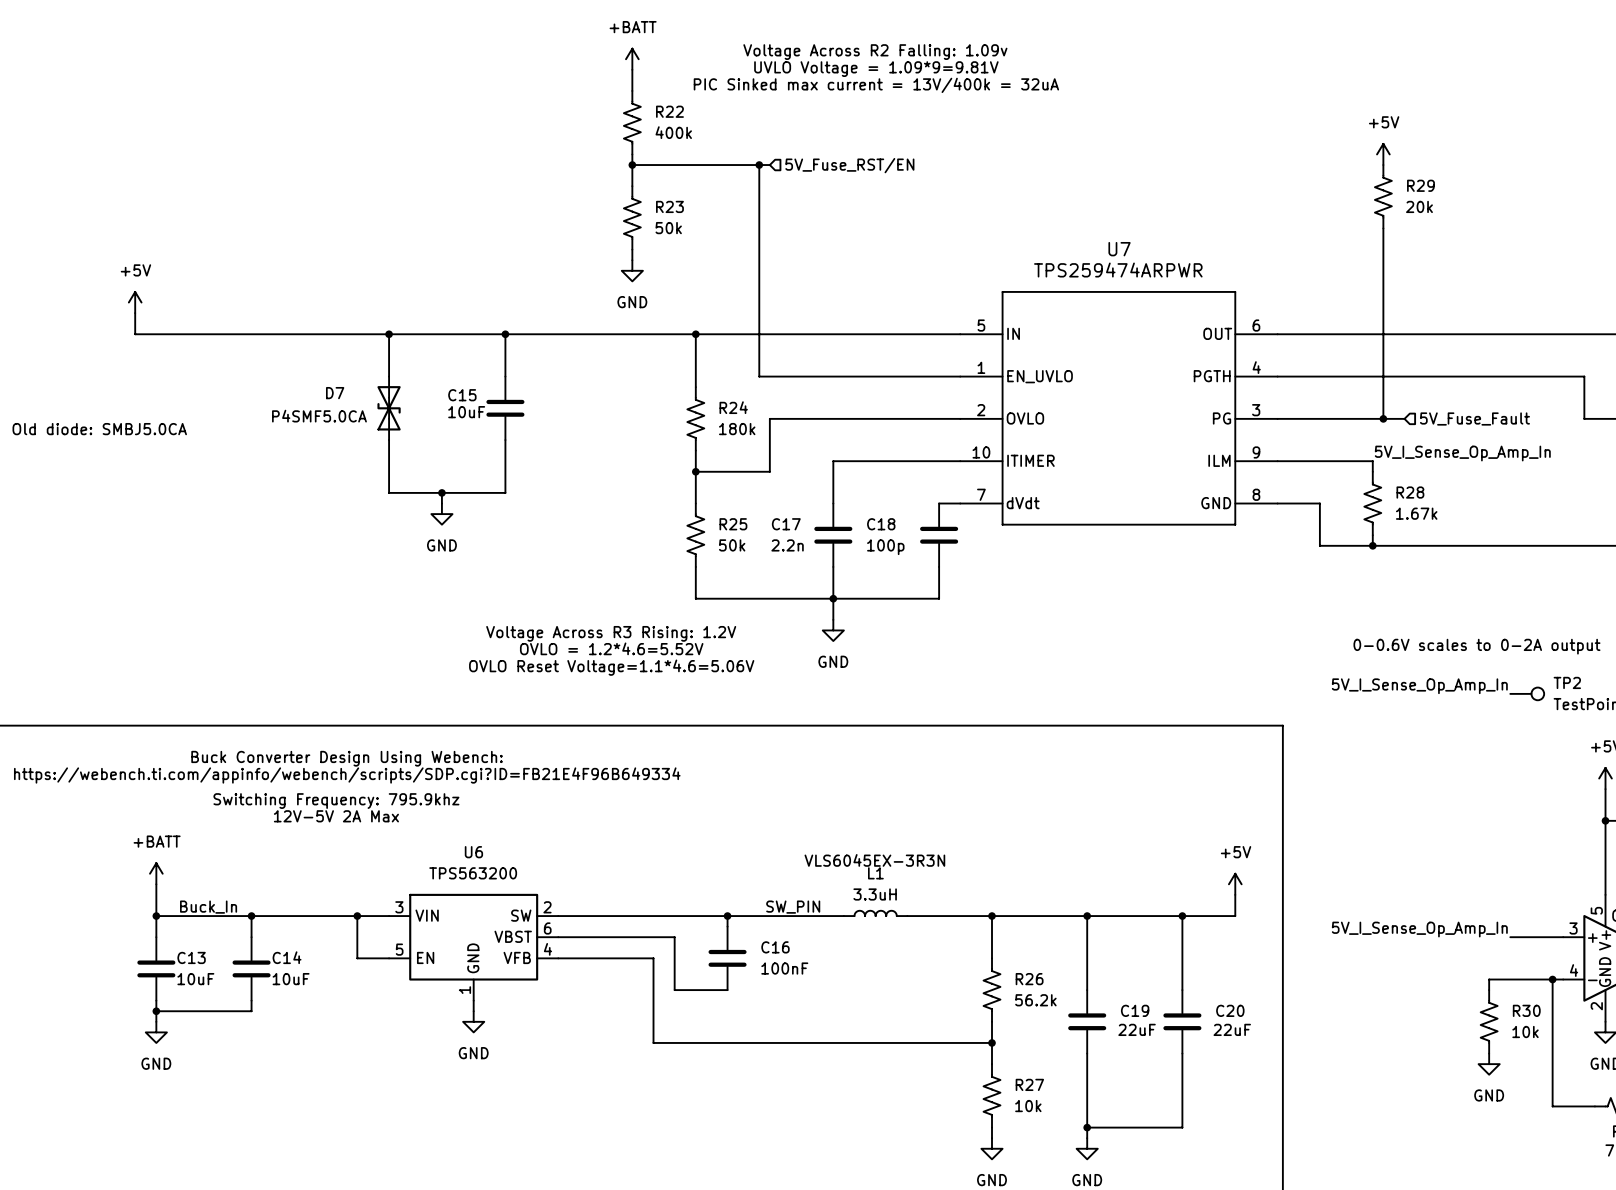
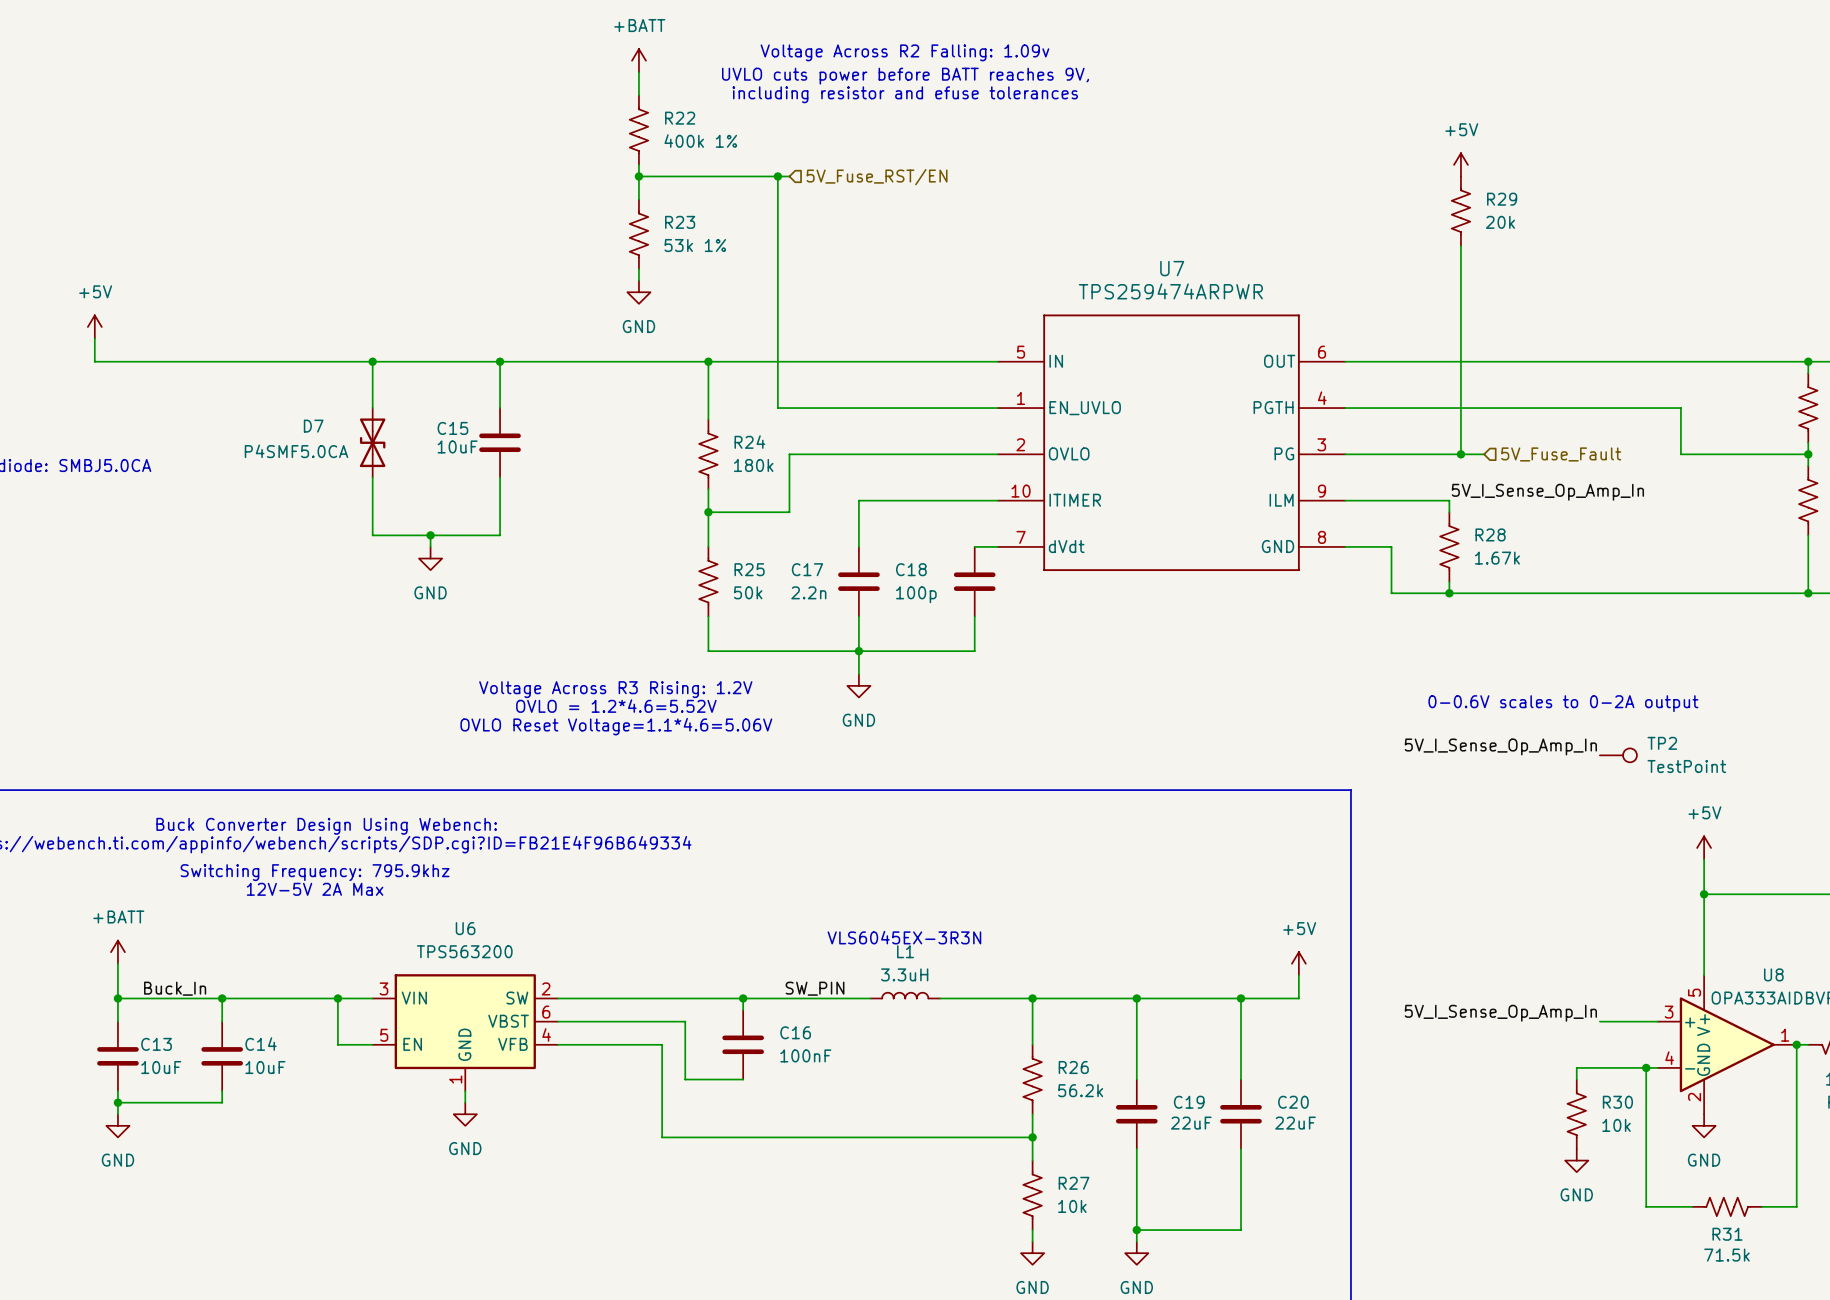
text: UVLO Voltage = 1.09*9=9.81V (876, 69) -> UVLO cuts power before BATT reaches 9V, (905, 76)
text: PIC Sinked max current = 13V/400k = 32uA (876, 85) -> including resistor and efuse tolerances (905, 94)
R22 value: 400k (673, 132) -> 400k 1% (700, 141)
R23 value: 50k (668, 228) -> 53k 1% (695, 245)

